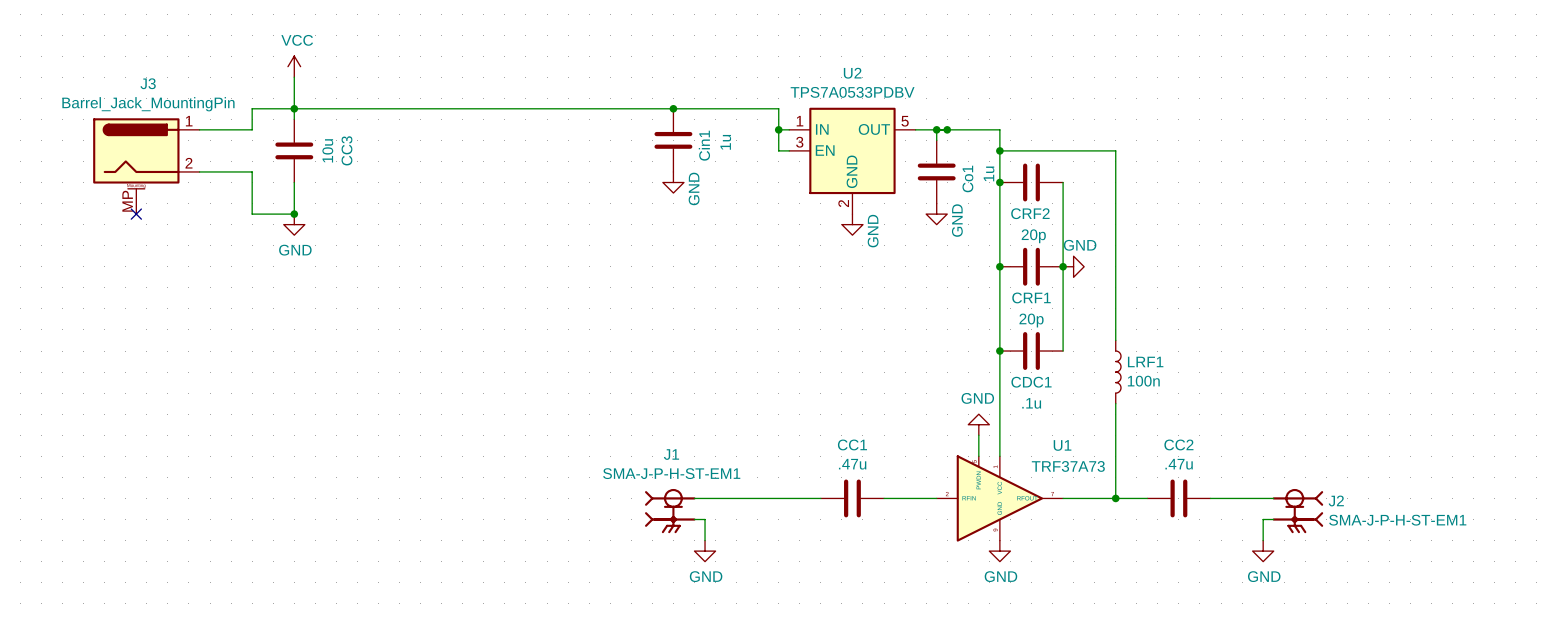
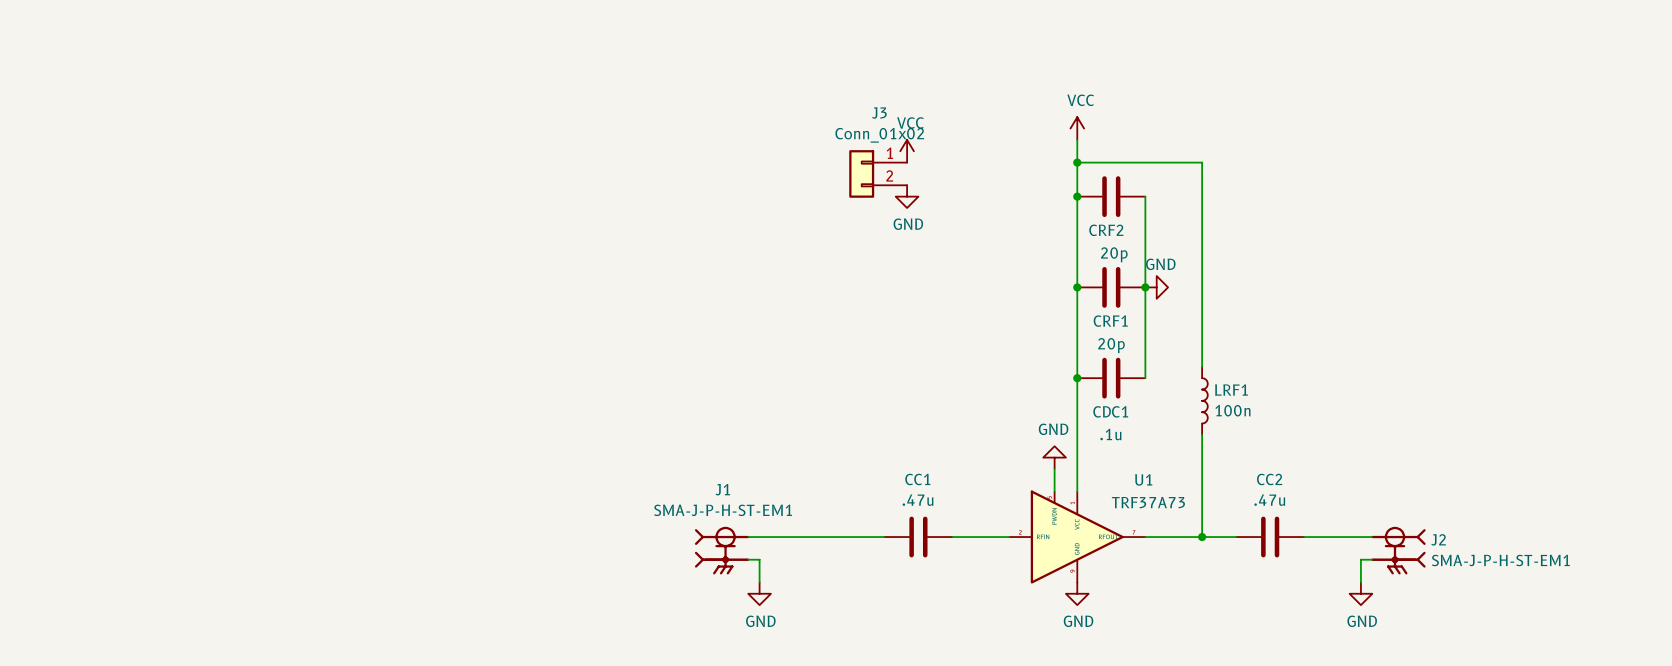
power symbol: VCC (294, 66) -> none
wire: (294, 77) (294, 119) -> none
J3 name position: J3 (148, 83) -> J3 (879, 112)
J3 value: Barrel_Jack_MountingPin (148, 104) -> Conn_01x02 (879, 135)
junction: (294, 108) -> none
junction: (673, 108) -> none
J3 symbol: [93, 118, 200, 215] -> [849, 150, 908, 198]
power symbol: none -> VCC (1077, 128)
wire: (199, 129) (252, 129) (252, 108) (778, 108) (778, 150) (789, 150) -> none
wire: (778, 129) (789, 129) -> none
junction: (778, 129) -> none
wire: (915, 129) (999, 129) -> none
wire: (936, 129) (936, 140) -> none
junction: (936, 129) -> none
junction: (947, 129) -> none
Cin1: 1u (673, 140) -> none
power symbol: none -> VCC (907, 151)
CC3: 10u (294, 150) -> none
U2: TPS7A0533PDBV (852, 160) -> none
wire: (199, 171) (252, 171) (252, 214) (294, 214) (294, 182) -> none
Co1: 1u (936, 171) -> none
power symbol: GND (673, 182) -> none
no-connect mark: (136, 214) -> none
junction: (294, 214) -> none
power symbol: GND (936, 214) -> none
power symbol: GND (294, 224) -> none
power symbol position: GND (852, 224) -> GND (907, 196)
power symbol text rotation: 0° (873, 231) -> 90° clockwise (908, 224)

